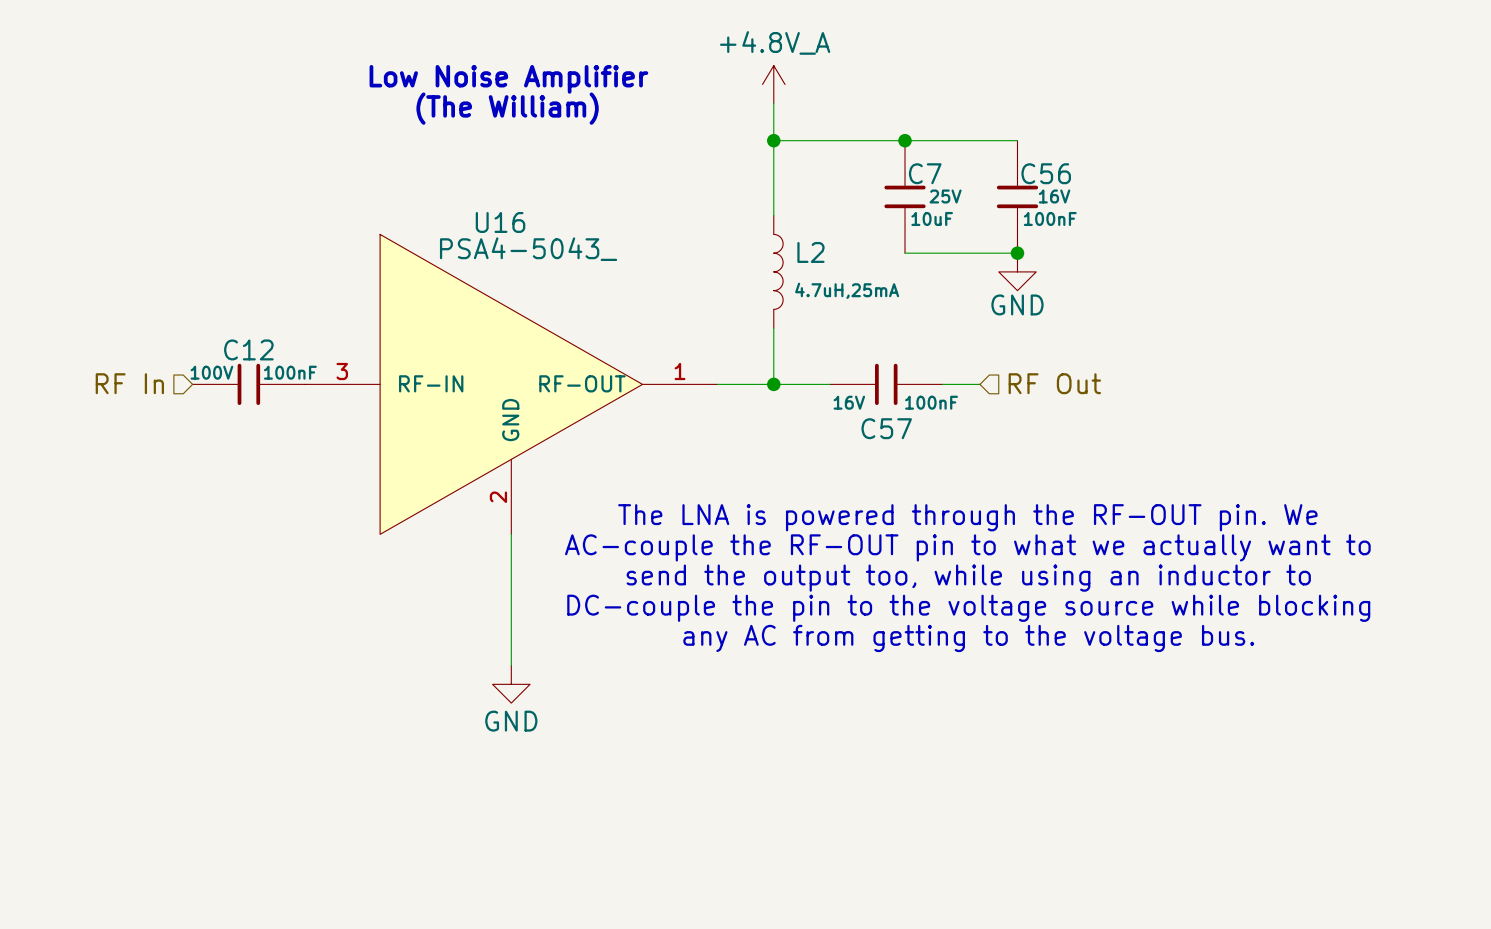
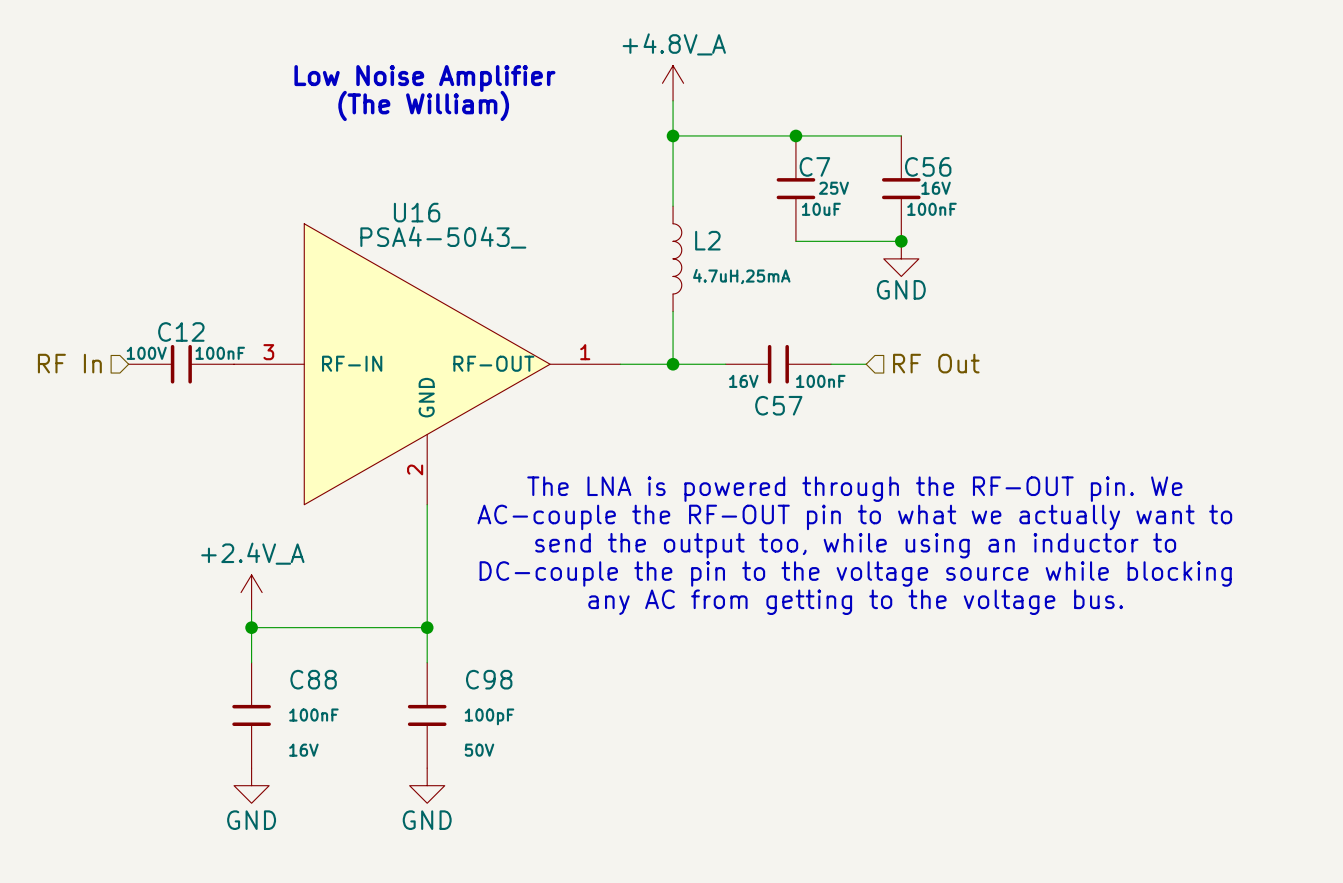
power symbol: none -> +2.4V_A (251, 592)
wire: none -> (251, 610) (251, 662)
wire: none -> (251, 627) (427, 627) (427, 662)
junction: none -> (251, 627)
junction: none -> (427, 627)
power symbol: GND (511, 684) -> none
C88: none -> 100nF (251, 715)
C98: none -> 100pF (427, 715)
power symbol: none -> GND (251, 785)
power symbol: none -> GND (427, 785)

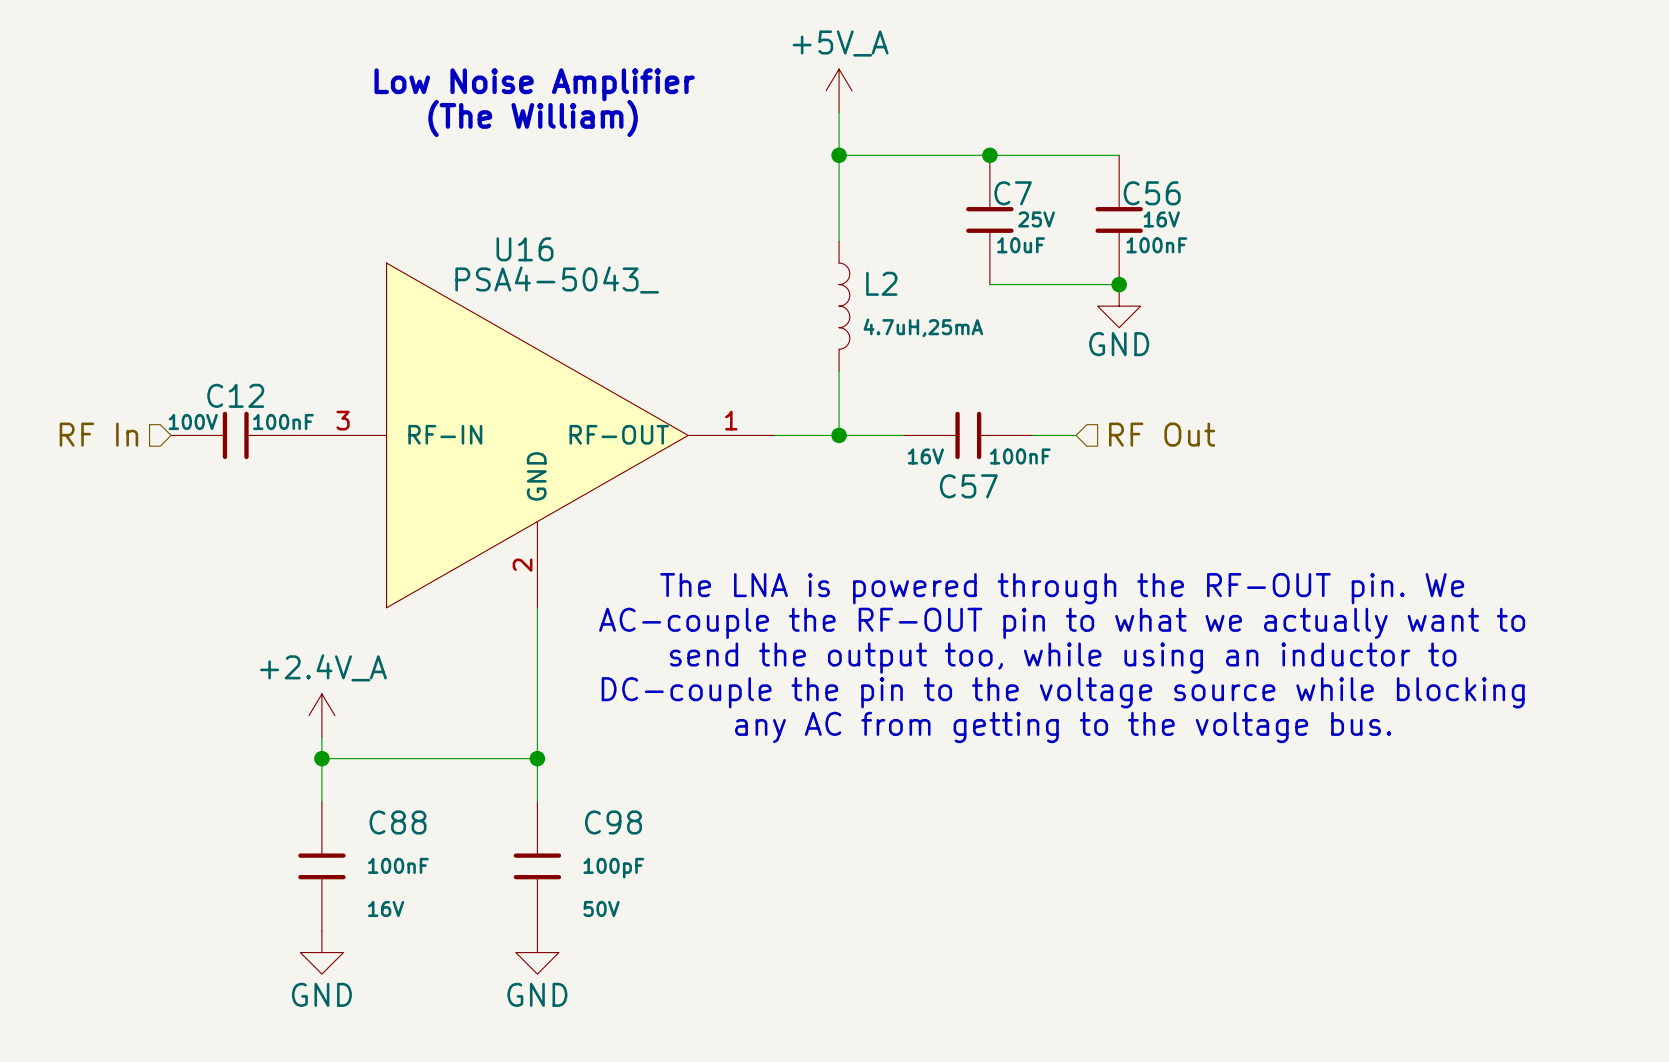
power symbol: +4.8V_A (673, 83) -> +5V_A (839, 90)

